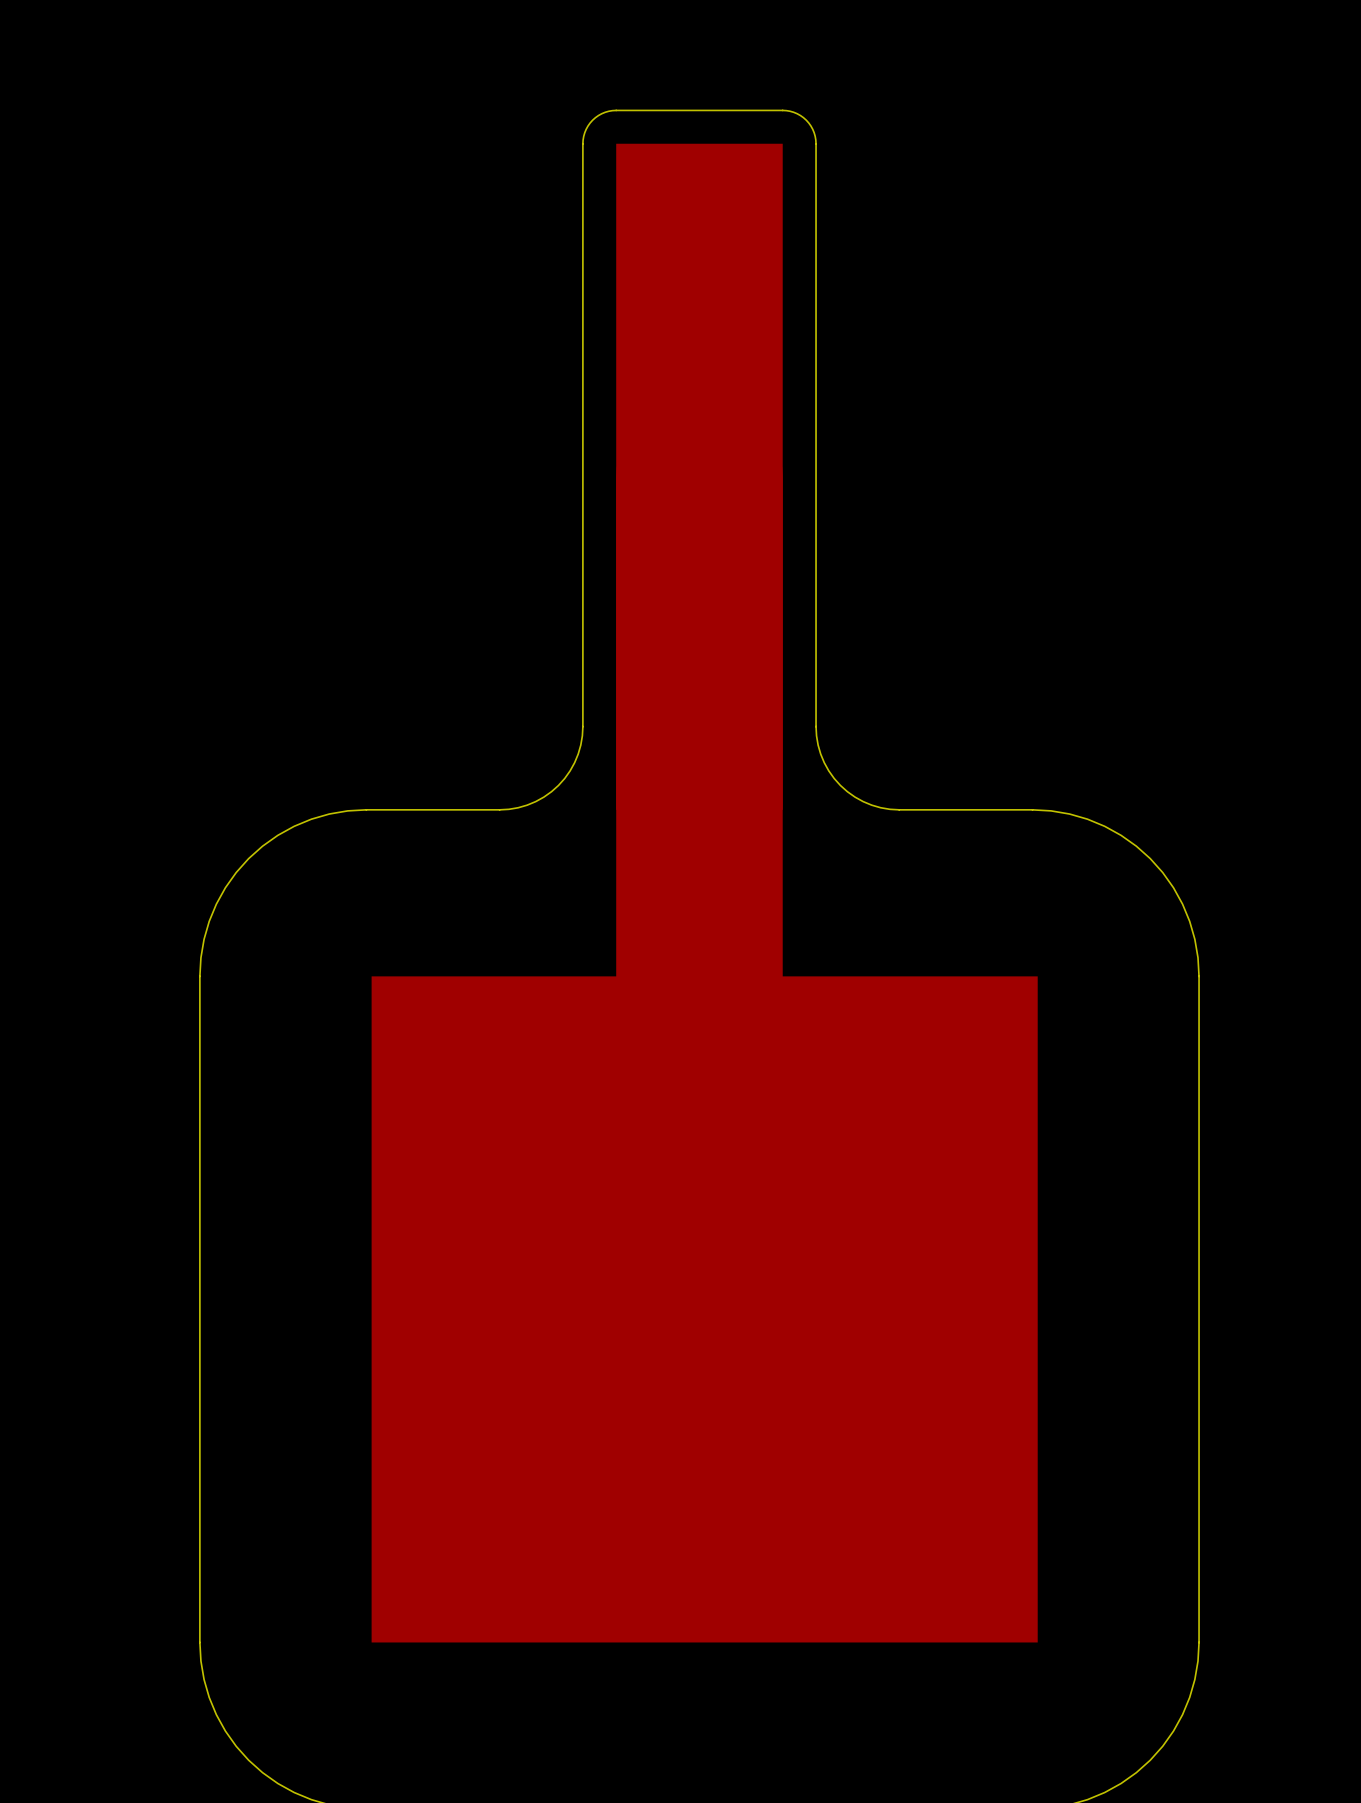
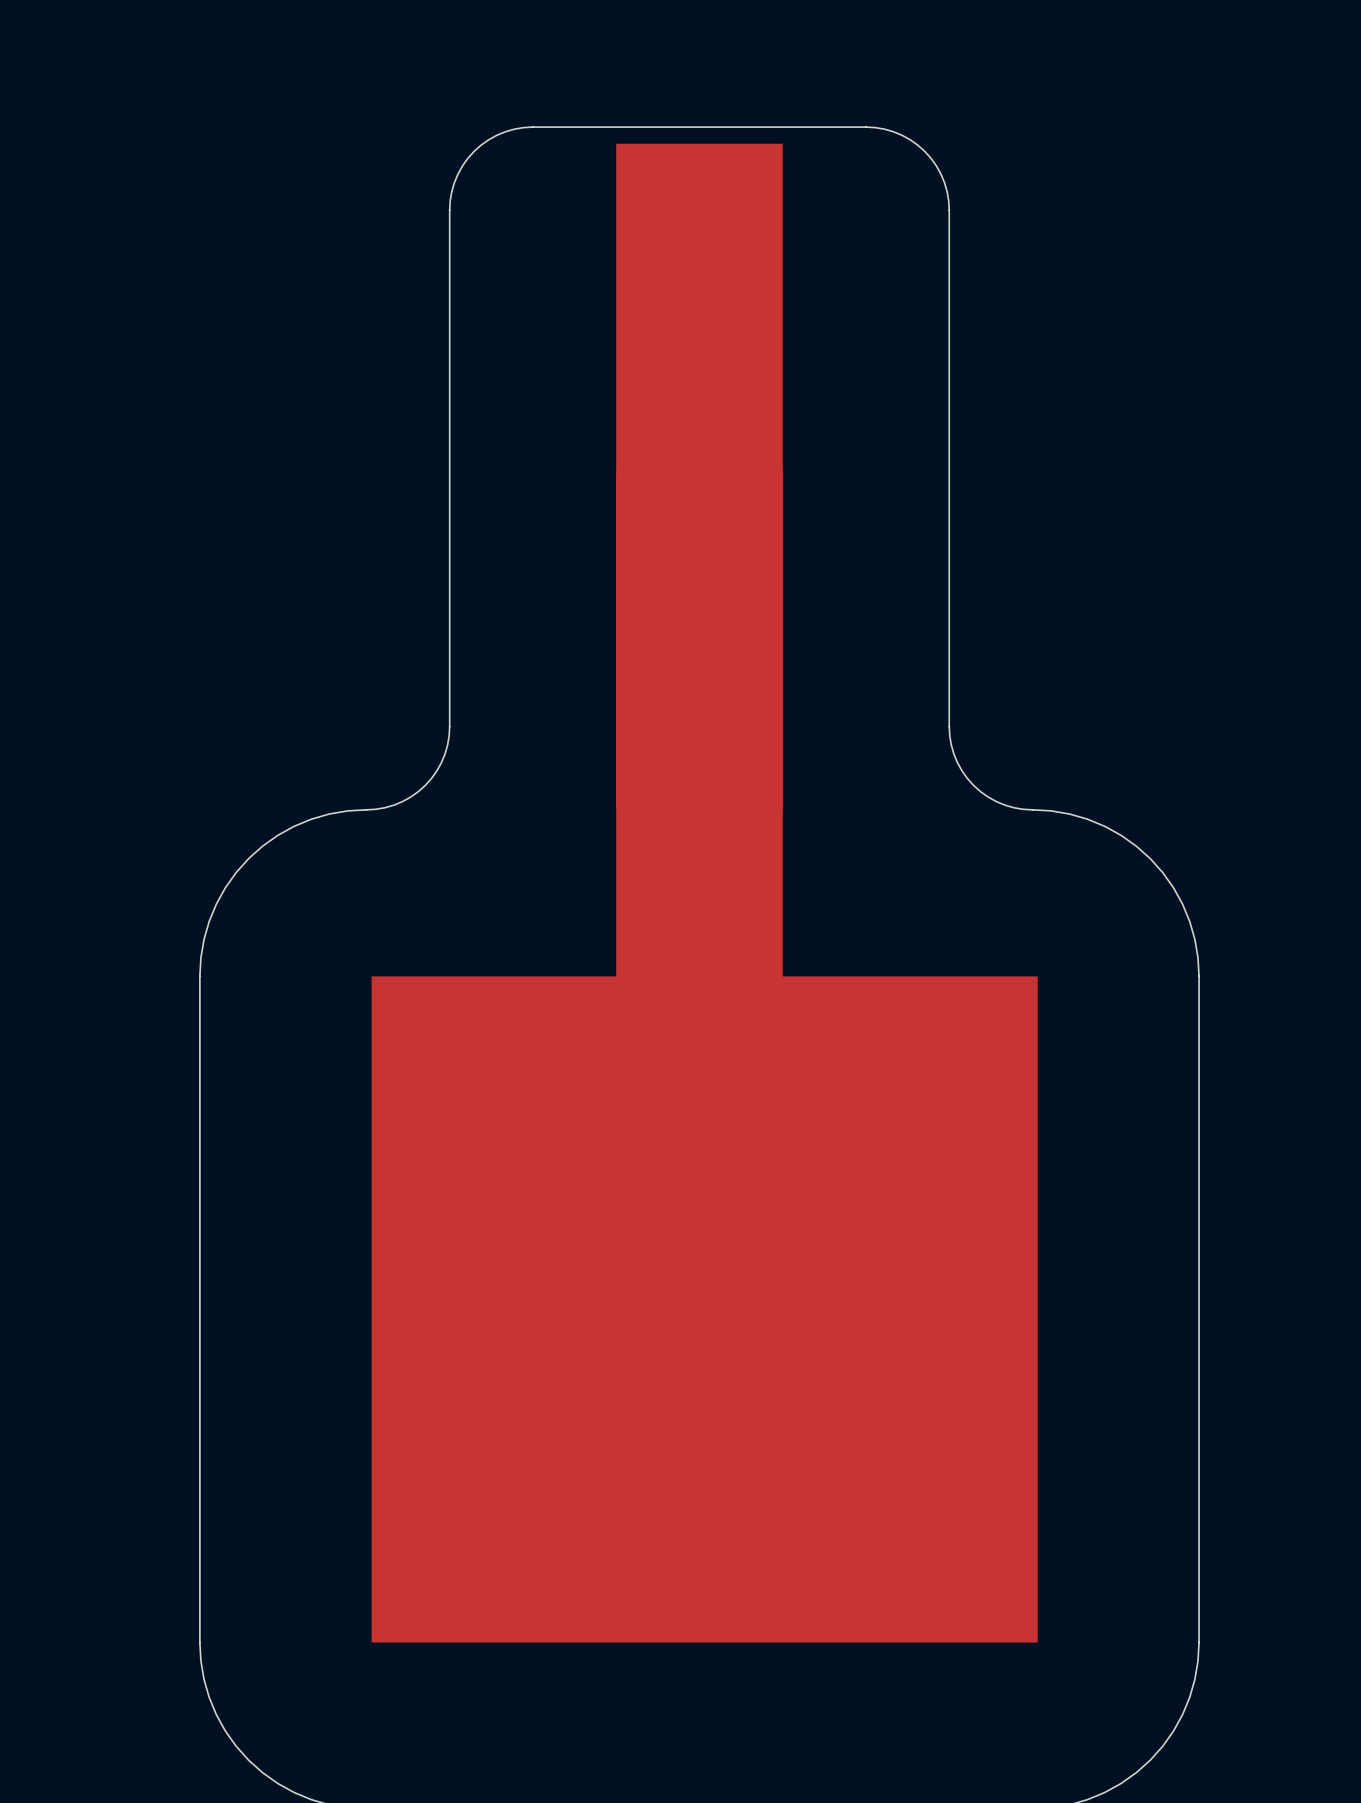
board edge: (1032, 809) (899, 809) (880, 807) (863, 801) (847, 791) (828, 770) (820, 754) (816, 726) (815, 140) (812, 129) (806, 120) (797, 113) (782, 110) (612, 110) (598, 115) (588, 126) (582, 143) (582, 726) (578, 754) (564, 778) (551, 791) (535, 801) (518, 807) (499, 809) (366, 809) -> (1032, 809) (1005, 805) (980, 791) (962, 770) (951, 745) (949, 726) (948, 201) (944, 182) (936, 166) (917, 145) (893, 131) (865, 127) (523, 127) (496, 135) (481, 145) (467, 158) (454, 182) (449, 210) (449, 735) (445, 754) (436, 770) (418, 791) (393, 805) (366, 809)

